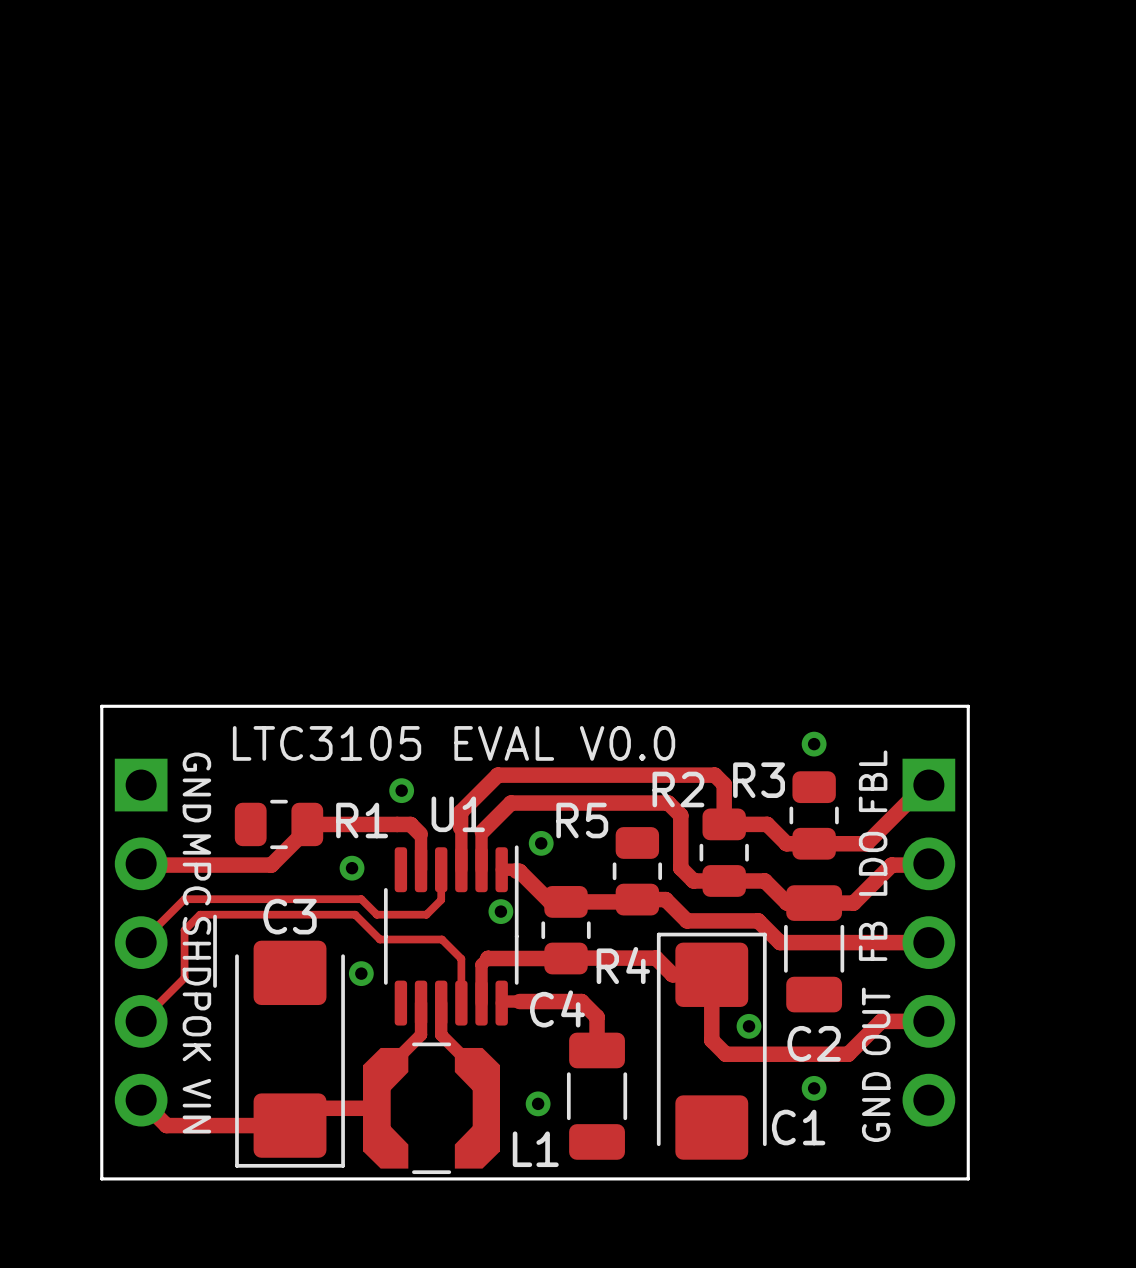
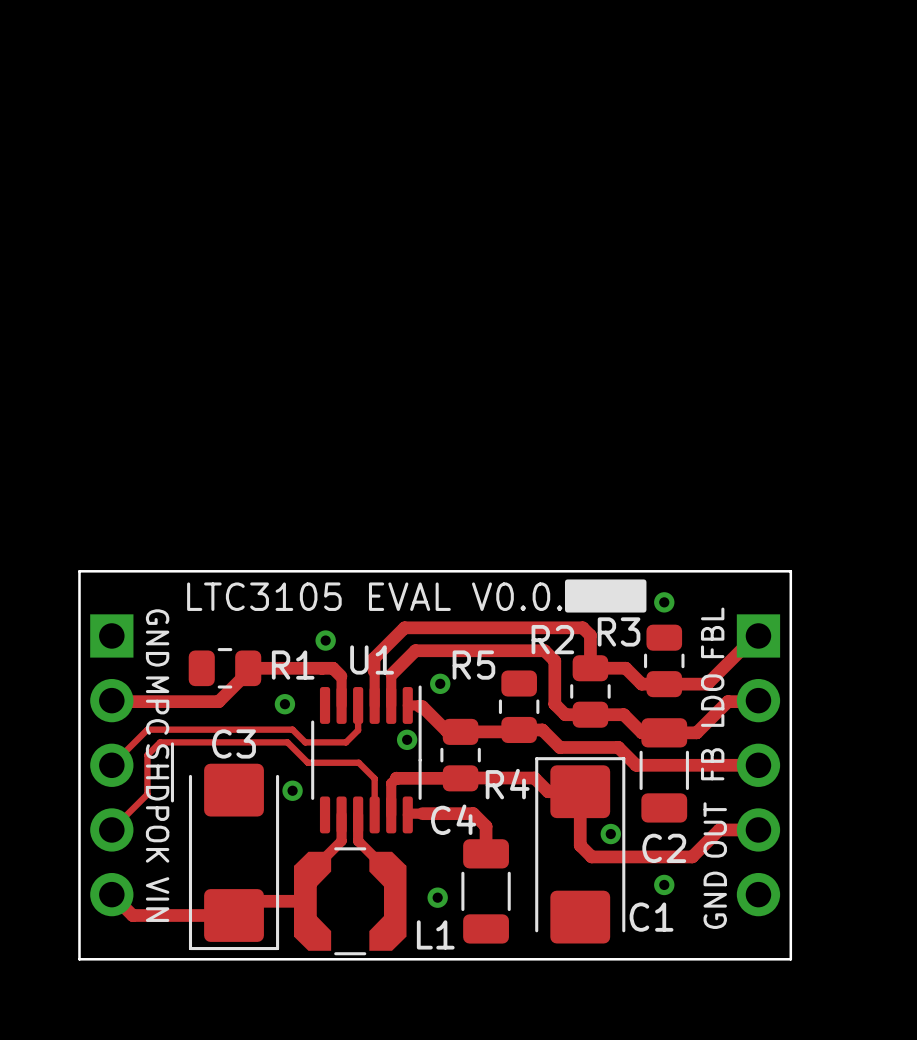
drawing: none -> [564, 579, 647, 613]
text: LTC3105 EVAL V0.0 (454, 743) -> LTC3105 EVAL V0.0. (374, 596)

